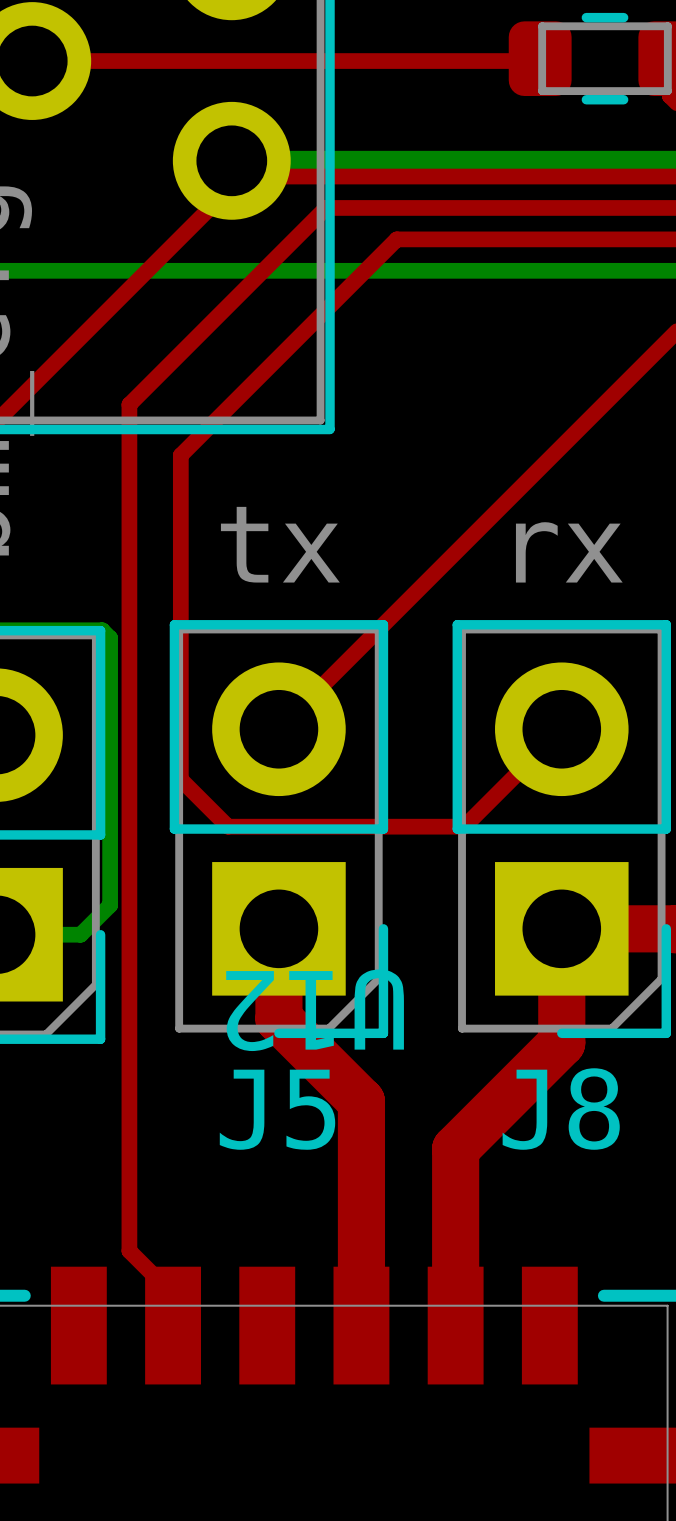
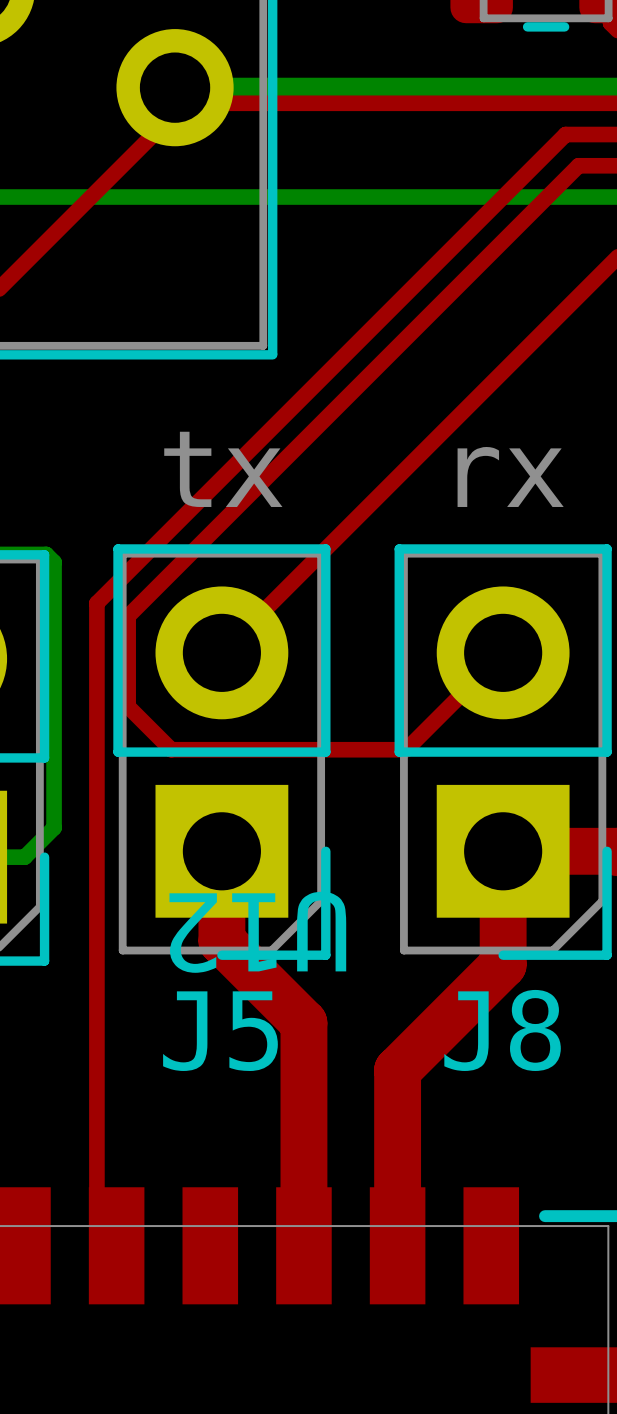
top track: (624, 207) (326, 207) (129, 404) (129, 1250) (173, 1294) (173, 1325) -> (565, 134) (96, 603) (96, 1226) (116, 1245)
top track: (637, 239) (396, 239) (180, 455) (180, 779) (184, 783) -> (578, 165) (128, 616) (128, 706)

